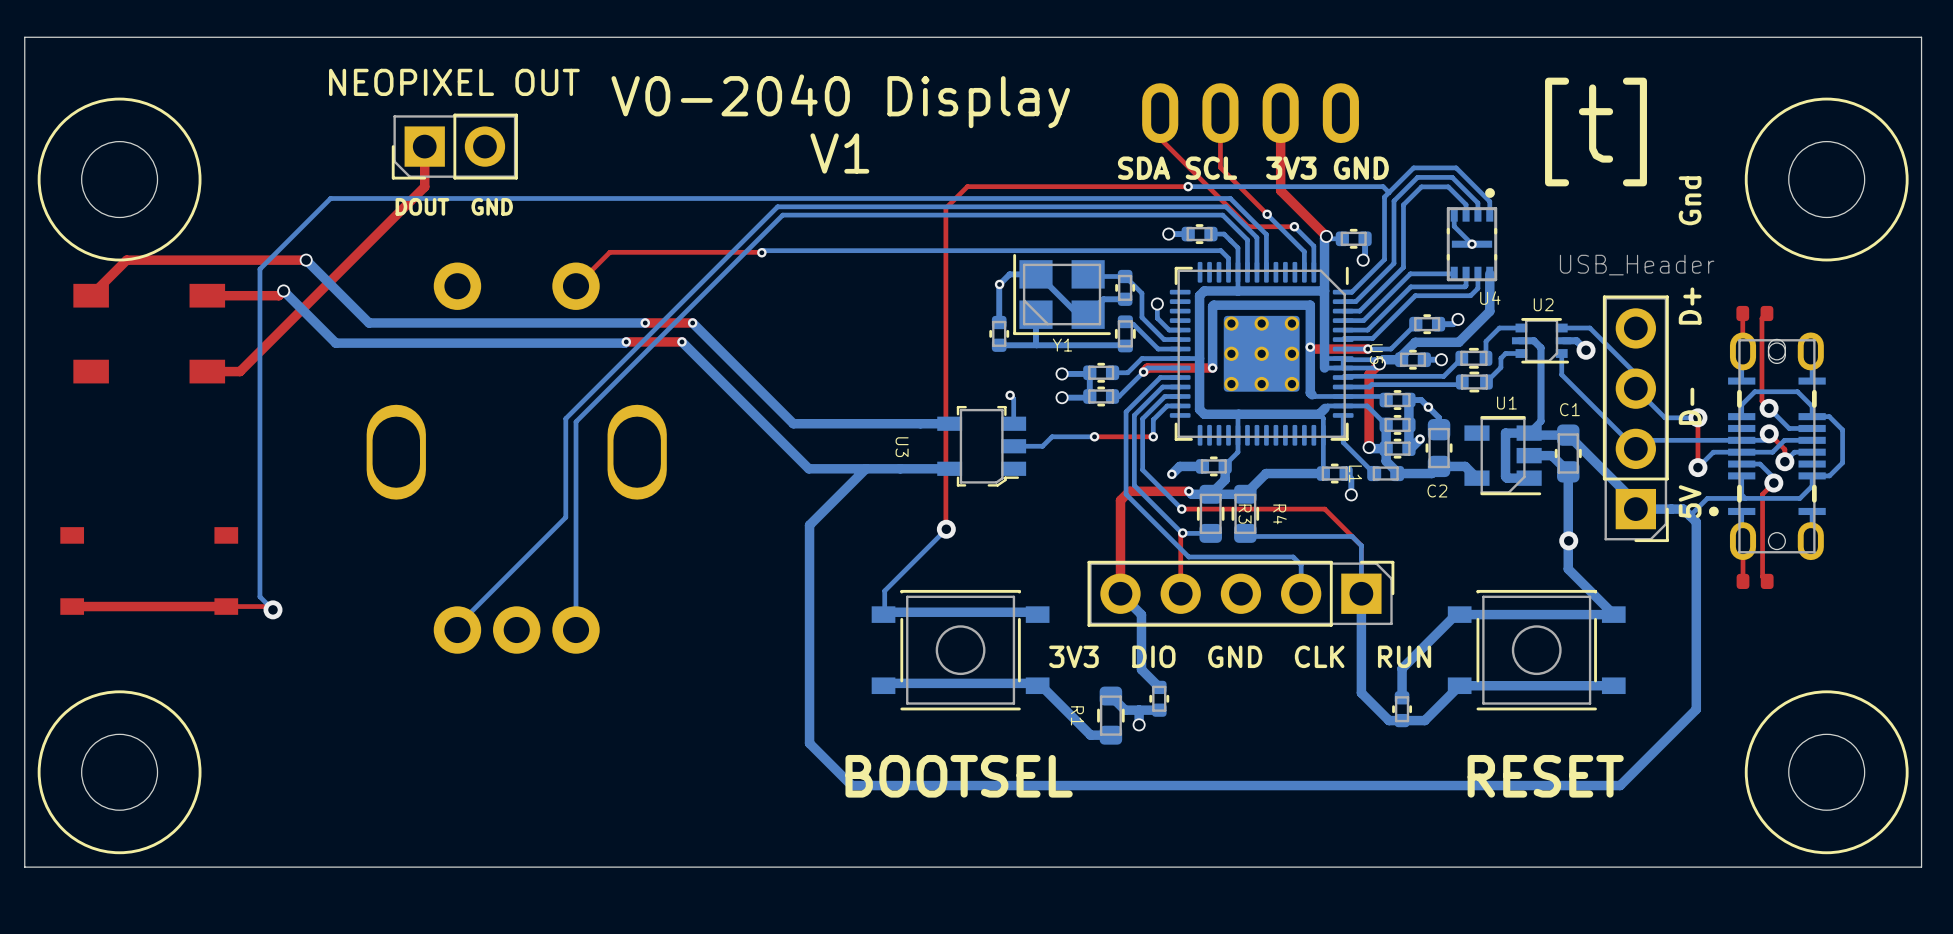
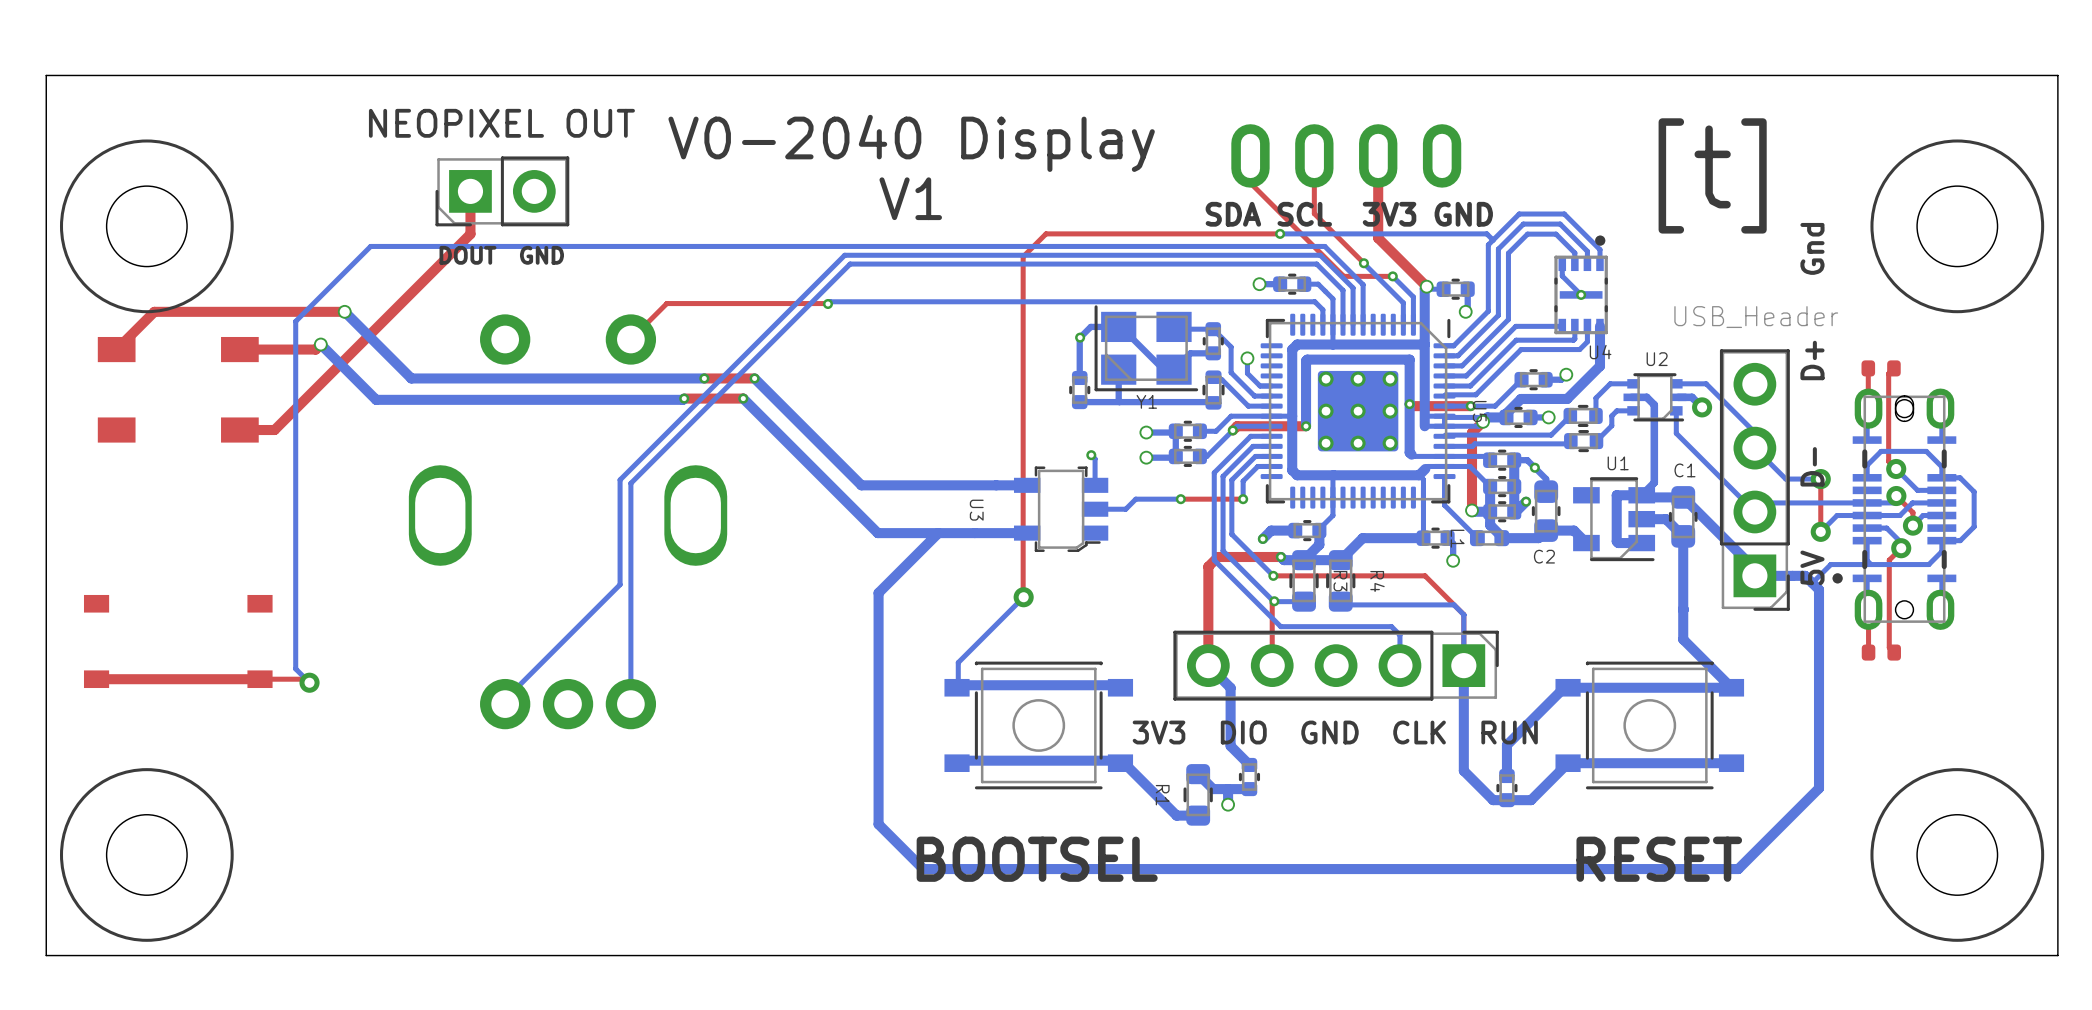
via: (1568, 540) -> none

